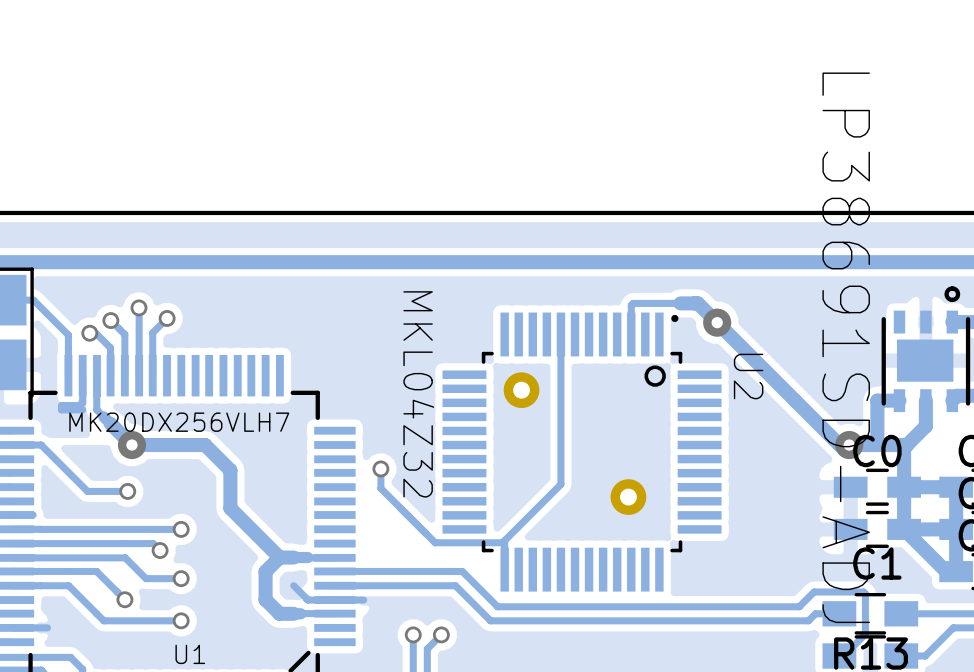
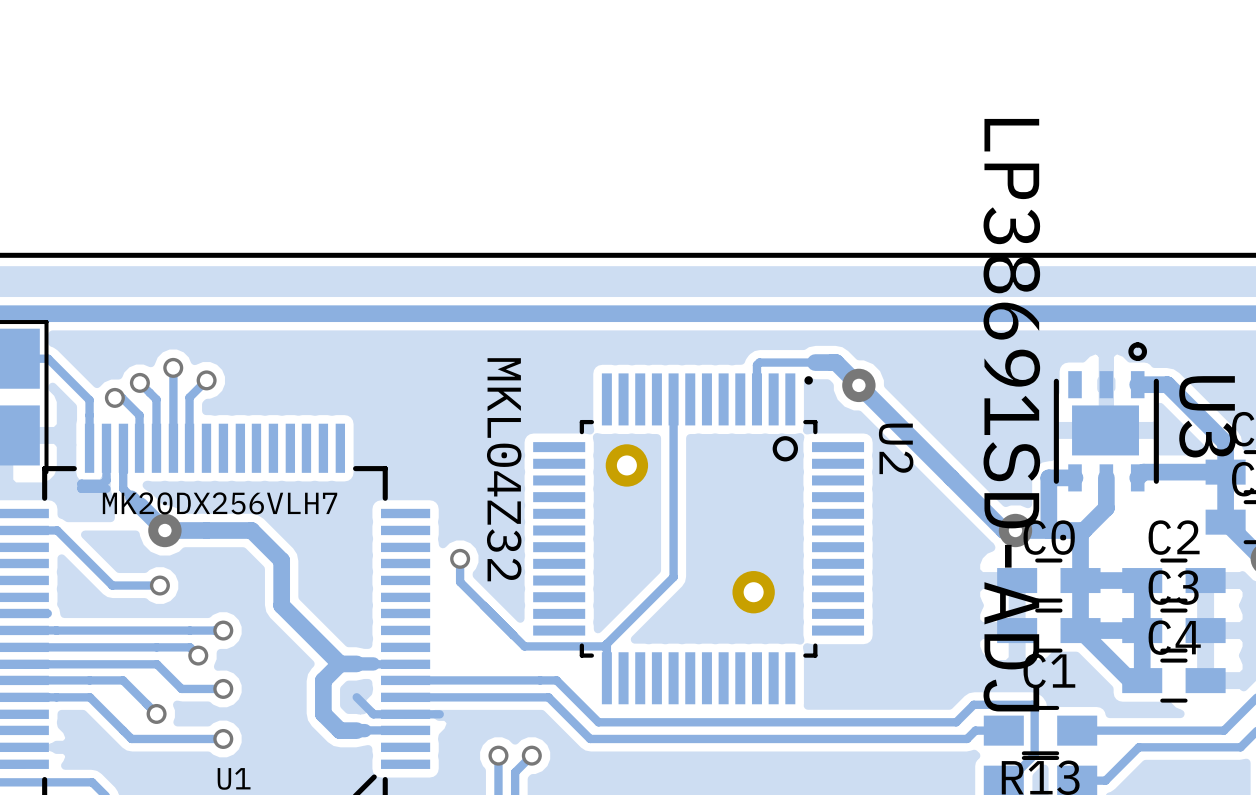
track: (47, 627) (13, 627) -> none

